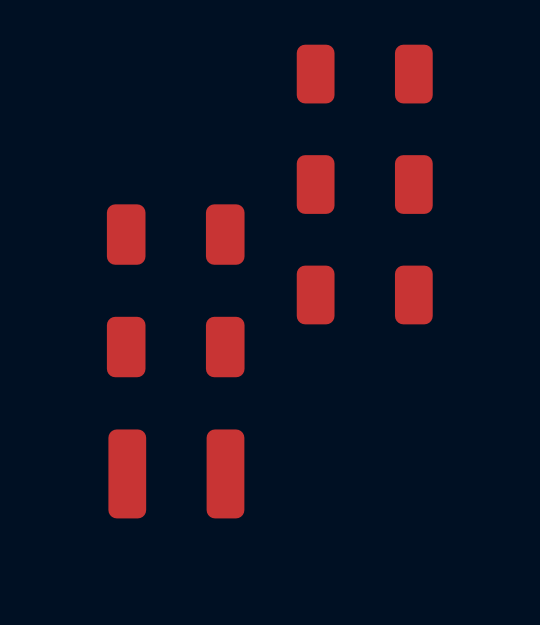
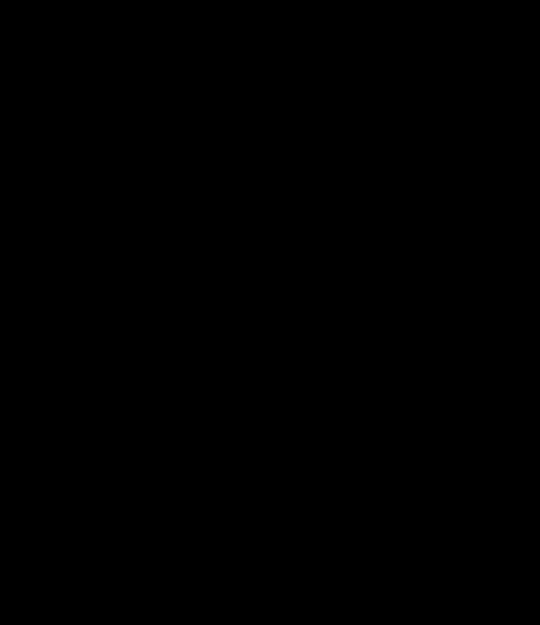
part: (364, 74) -> none
part: (364, 184) -> none
part: (175, 234) -> none
part: (364, 294) -> none
part: (175, 347) -> none
part: (176, 473) -> none

